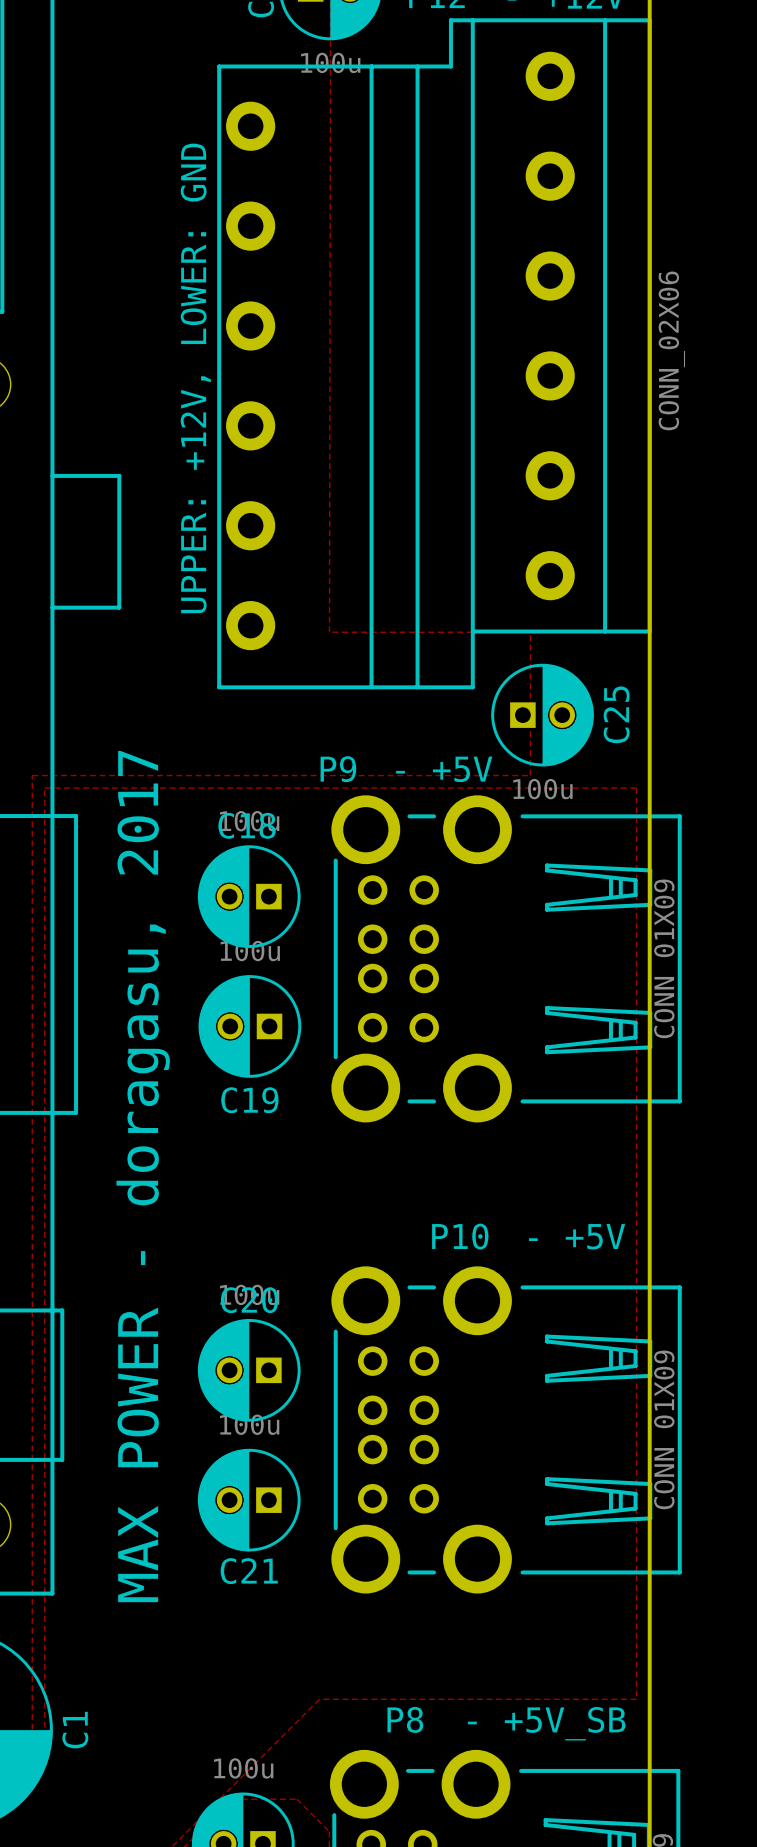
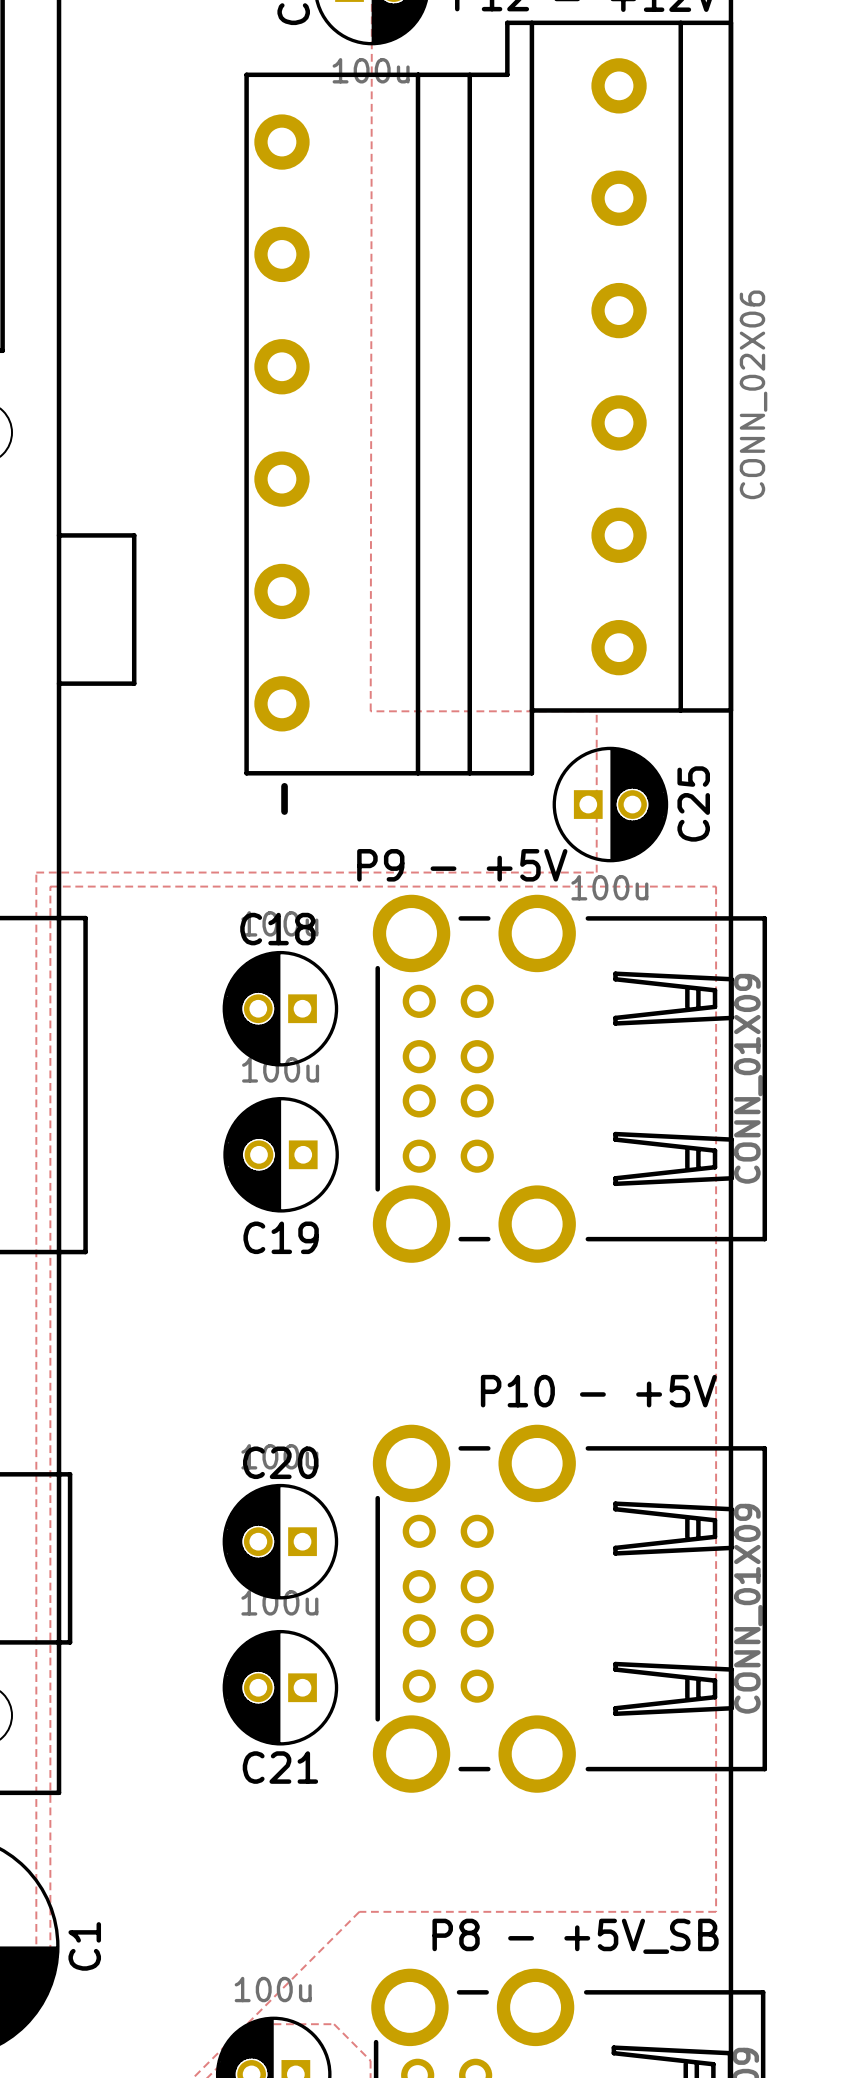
text: UPPER: +12V, LOWER: GND (195, 378) -> none
text: none -> - (284, 798)
text: MAX POWER - doragasu, 2017 (143, 1176) -> none

